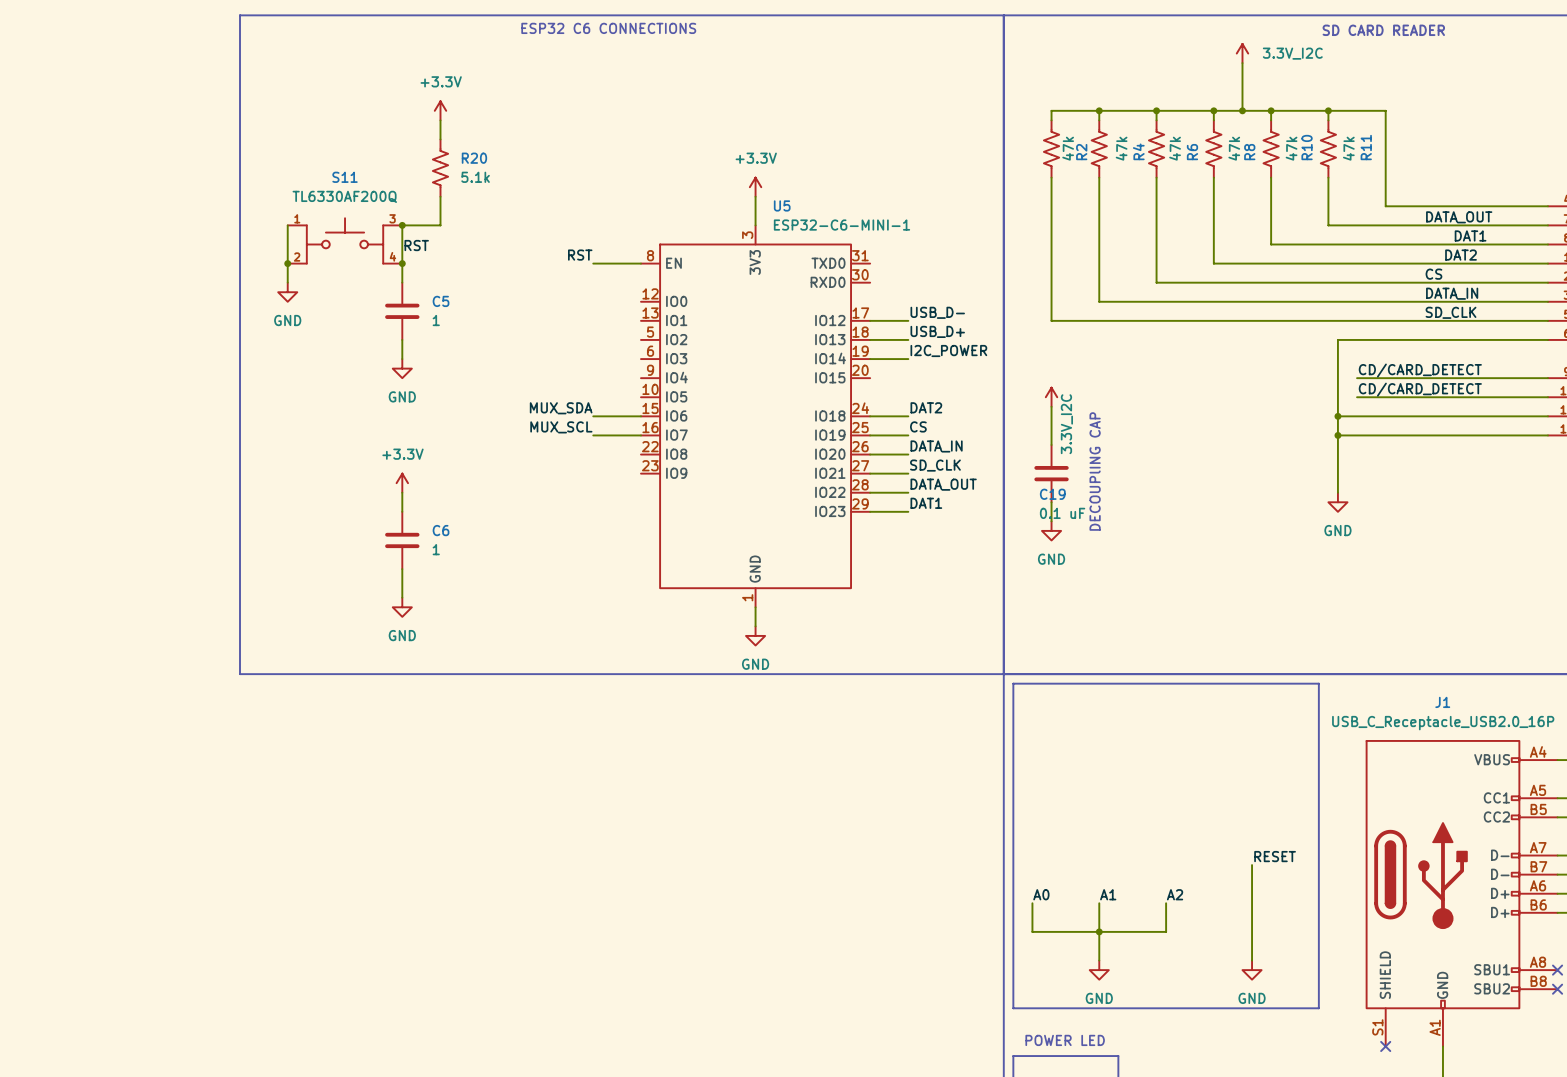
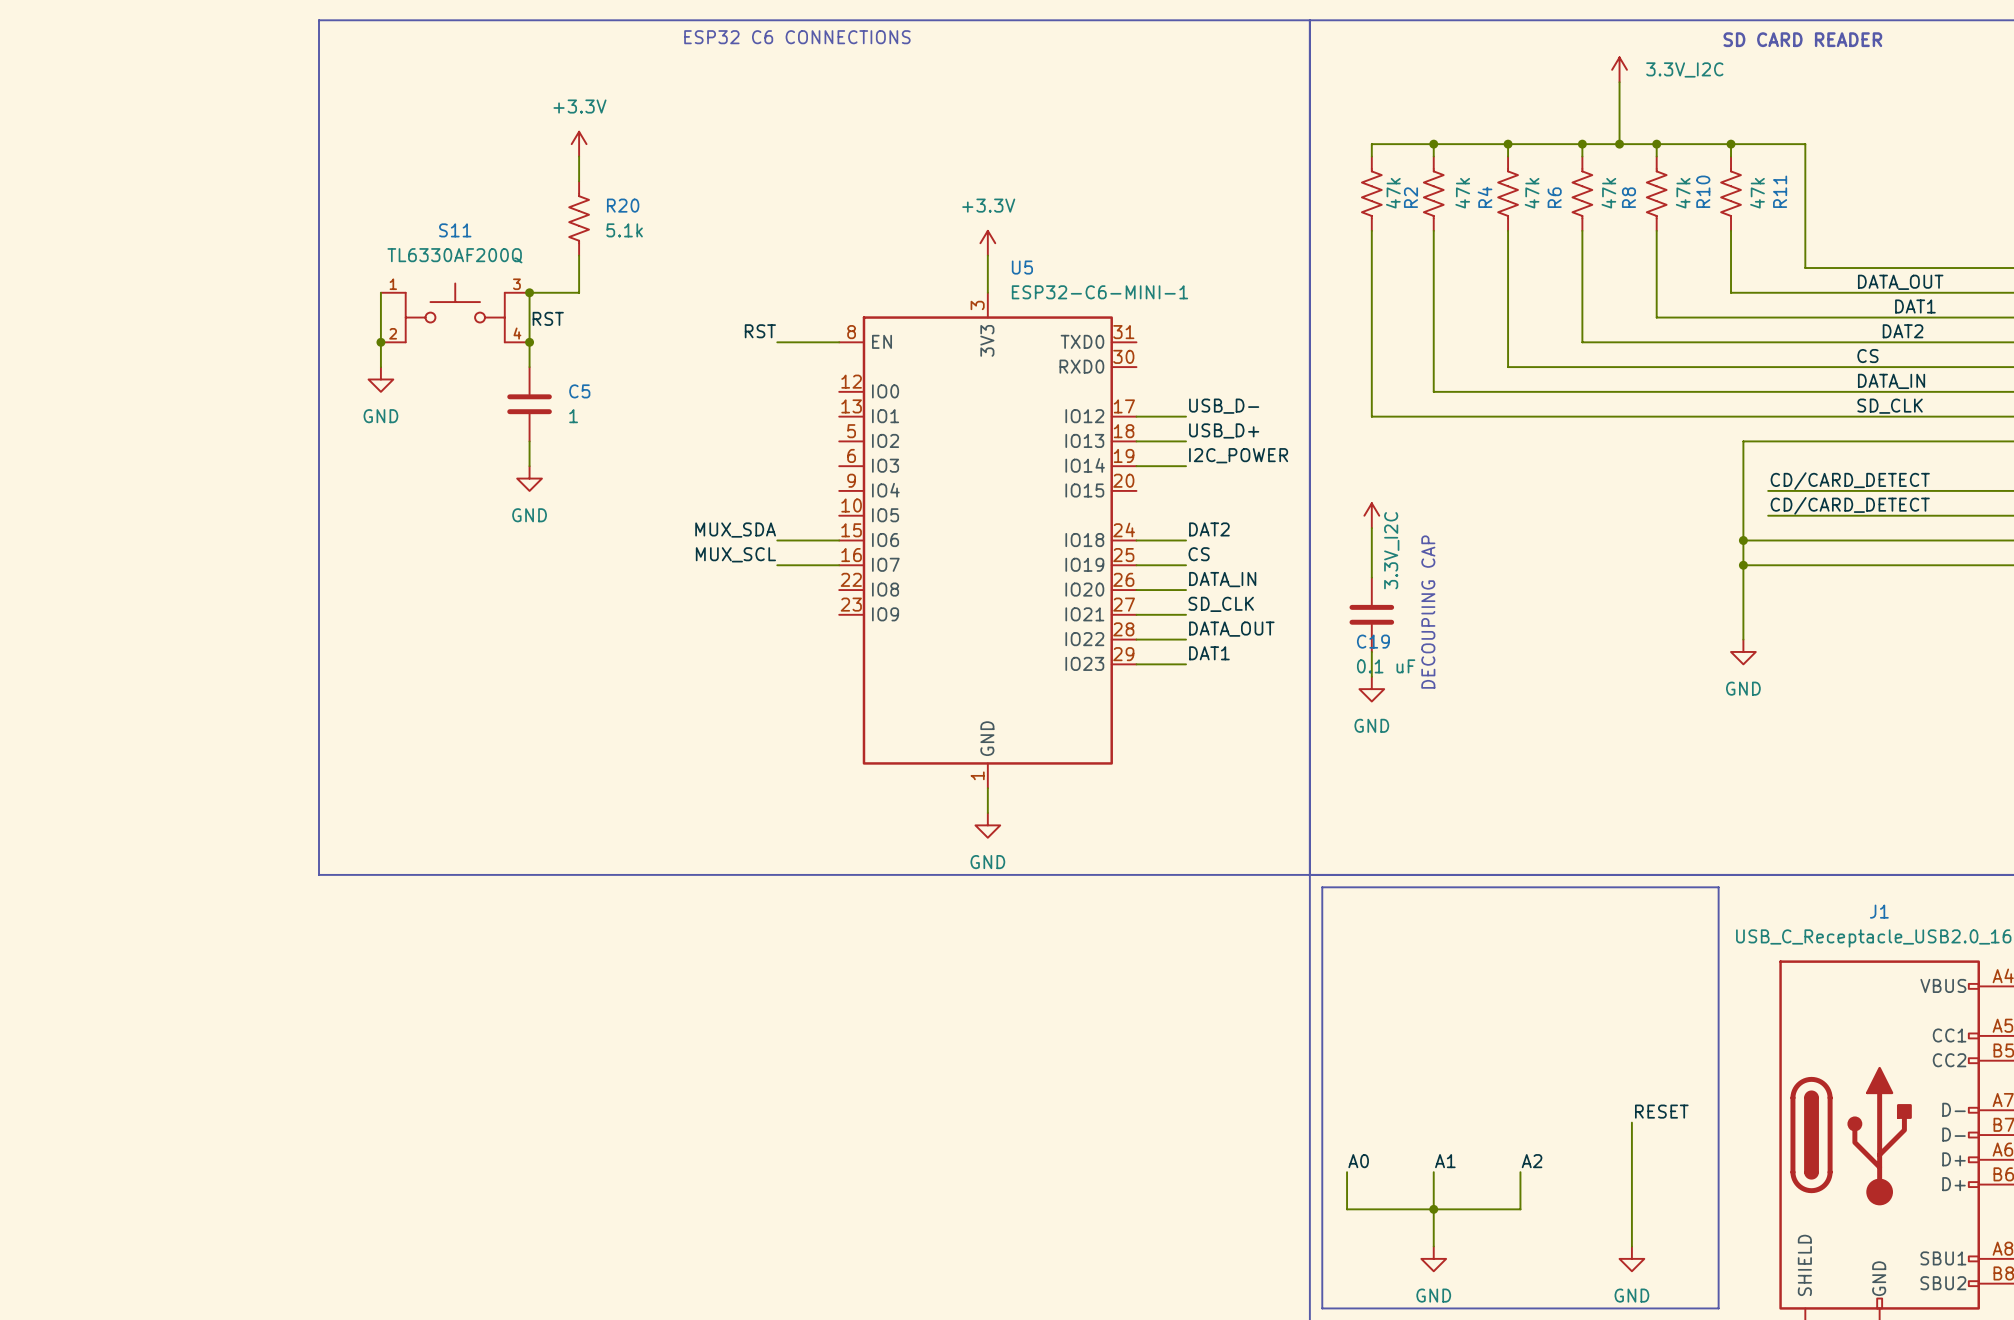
power symbol: +3.3V (402, 483) -> none
wire: (402, 492) (402, 511) -> none
C6: 1 (402, 540) -> none
wire: (402, 569) (402, 597) -> none
power symbol: GND (402, 607) -> none

